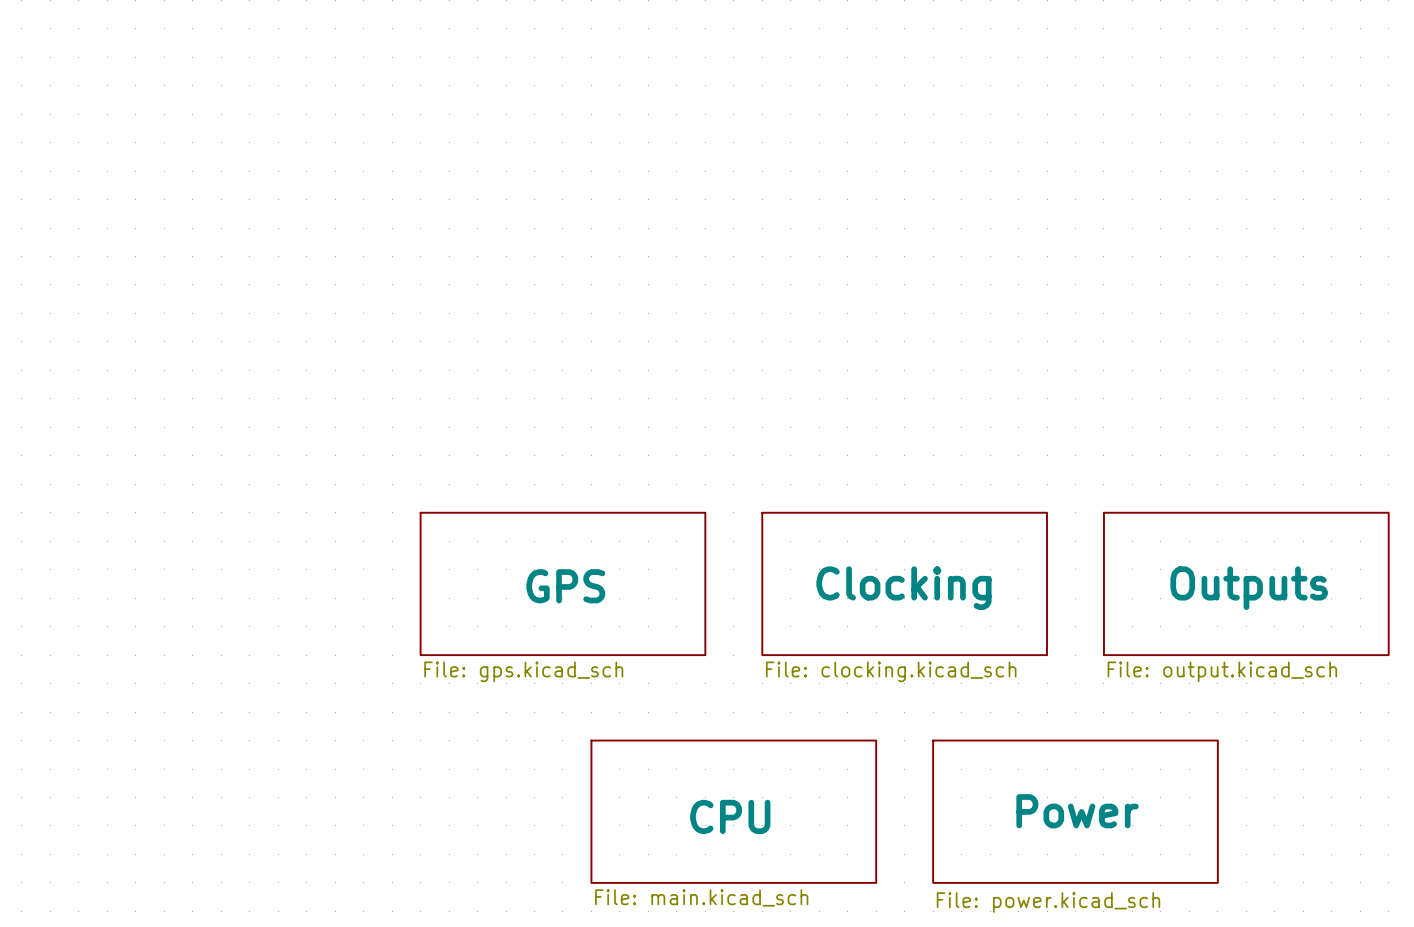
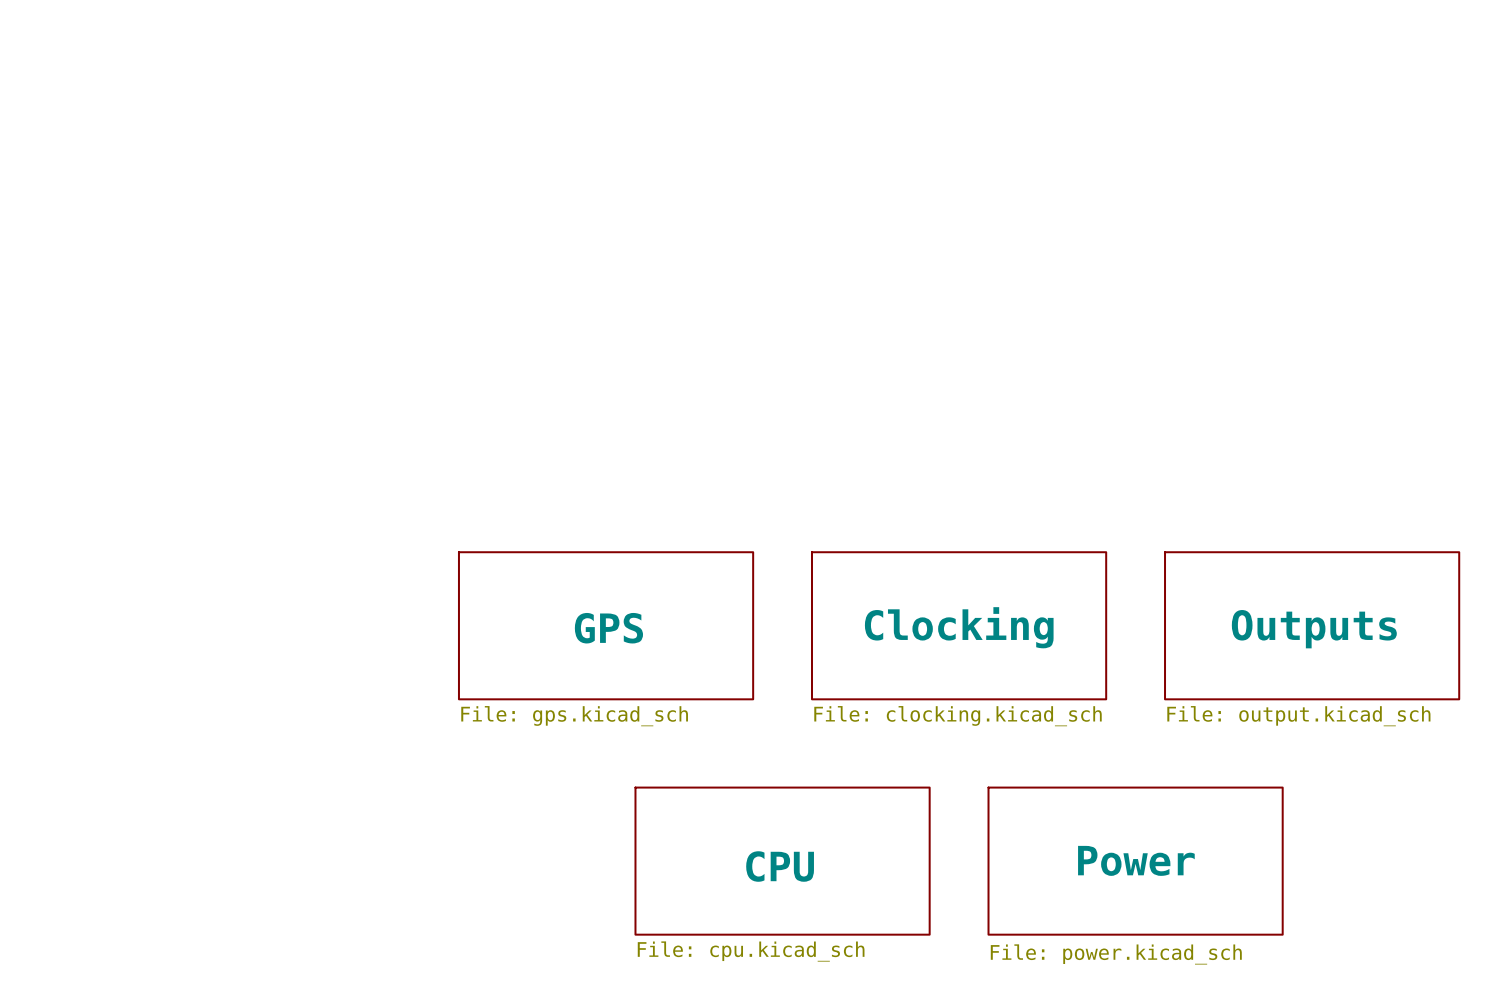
sheet CPU value: File: main.kicad_sch (701, 897) -> File: cpu.kicad_sch (751, 951)

